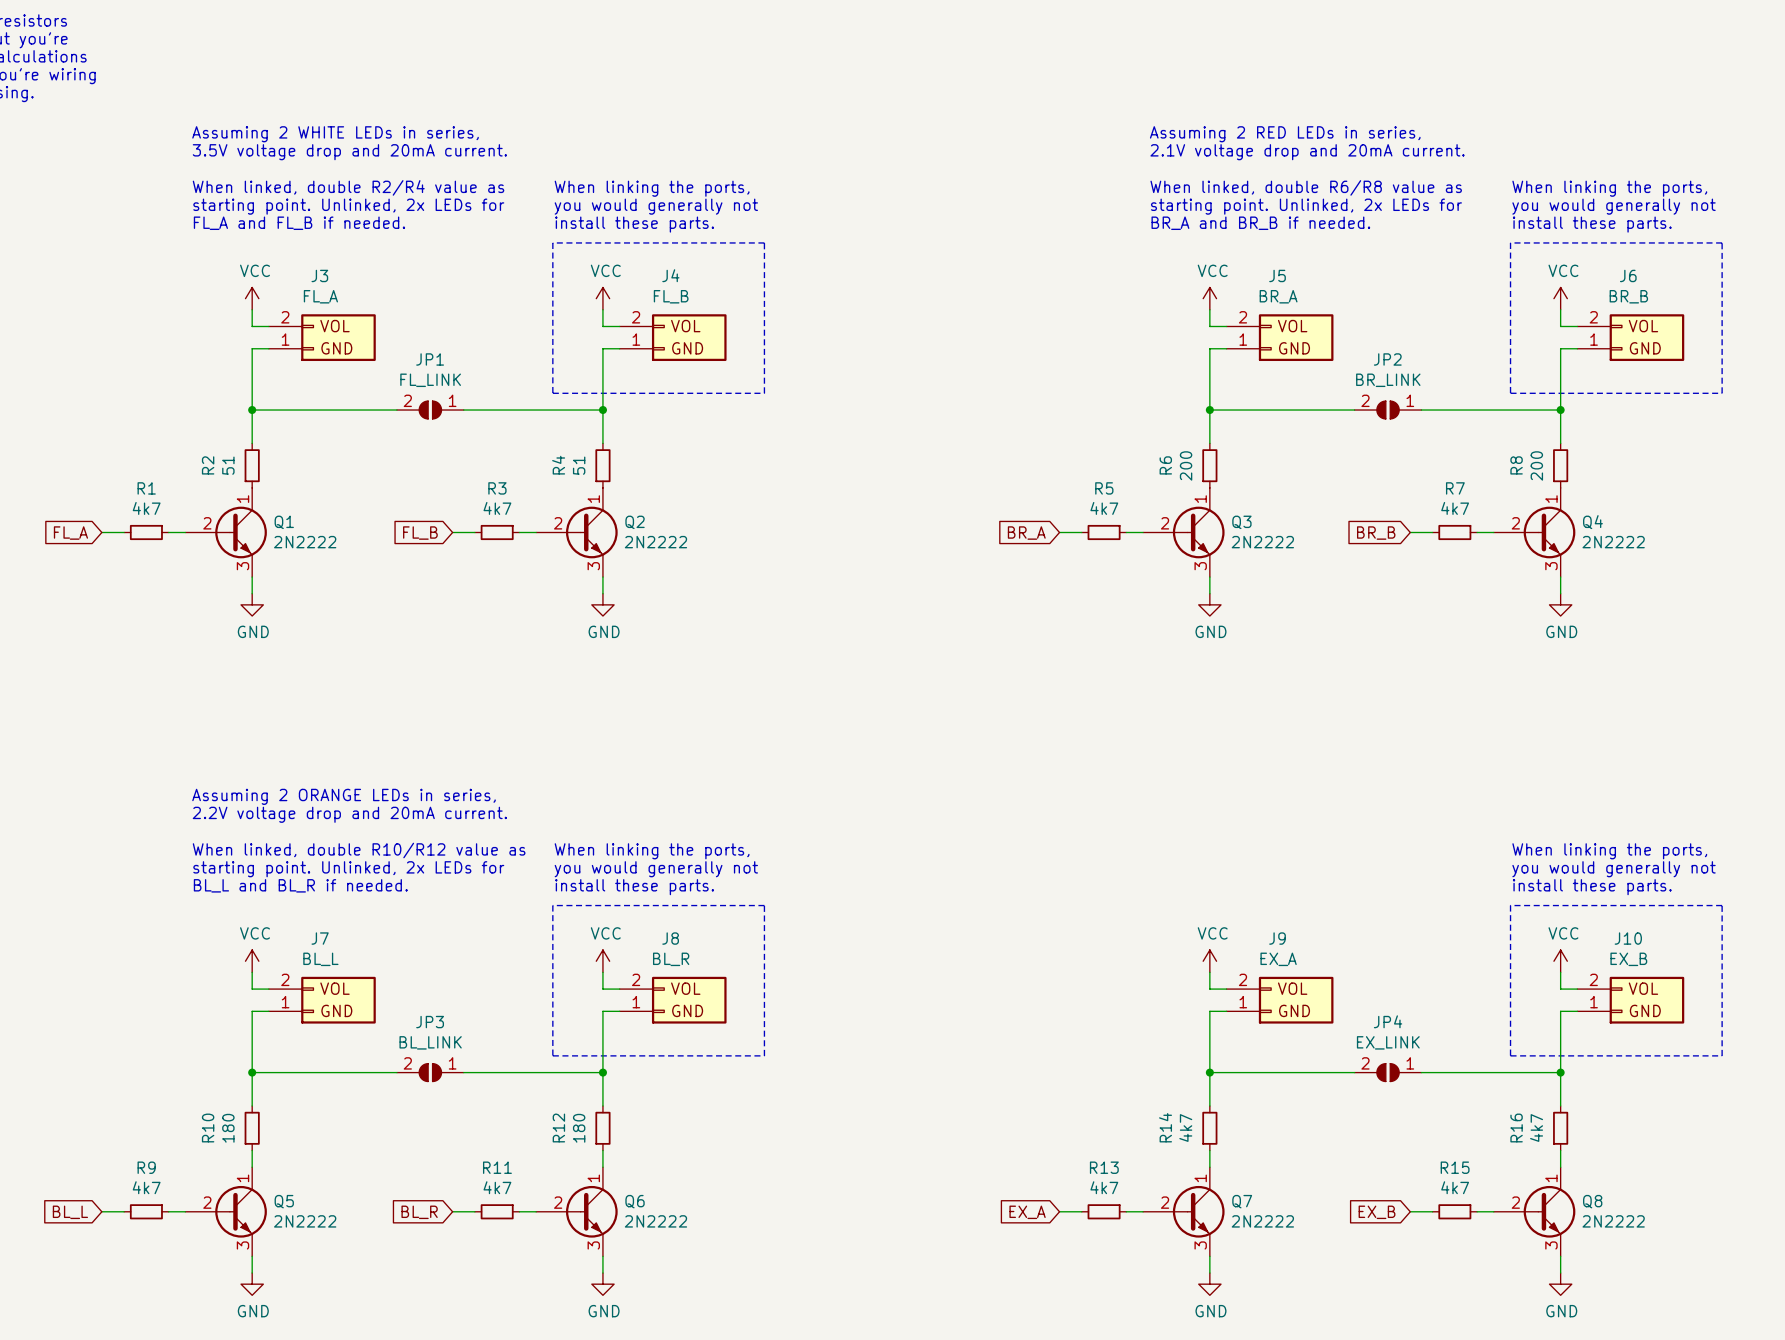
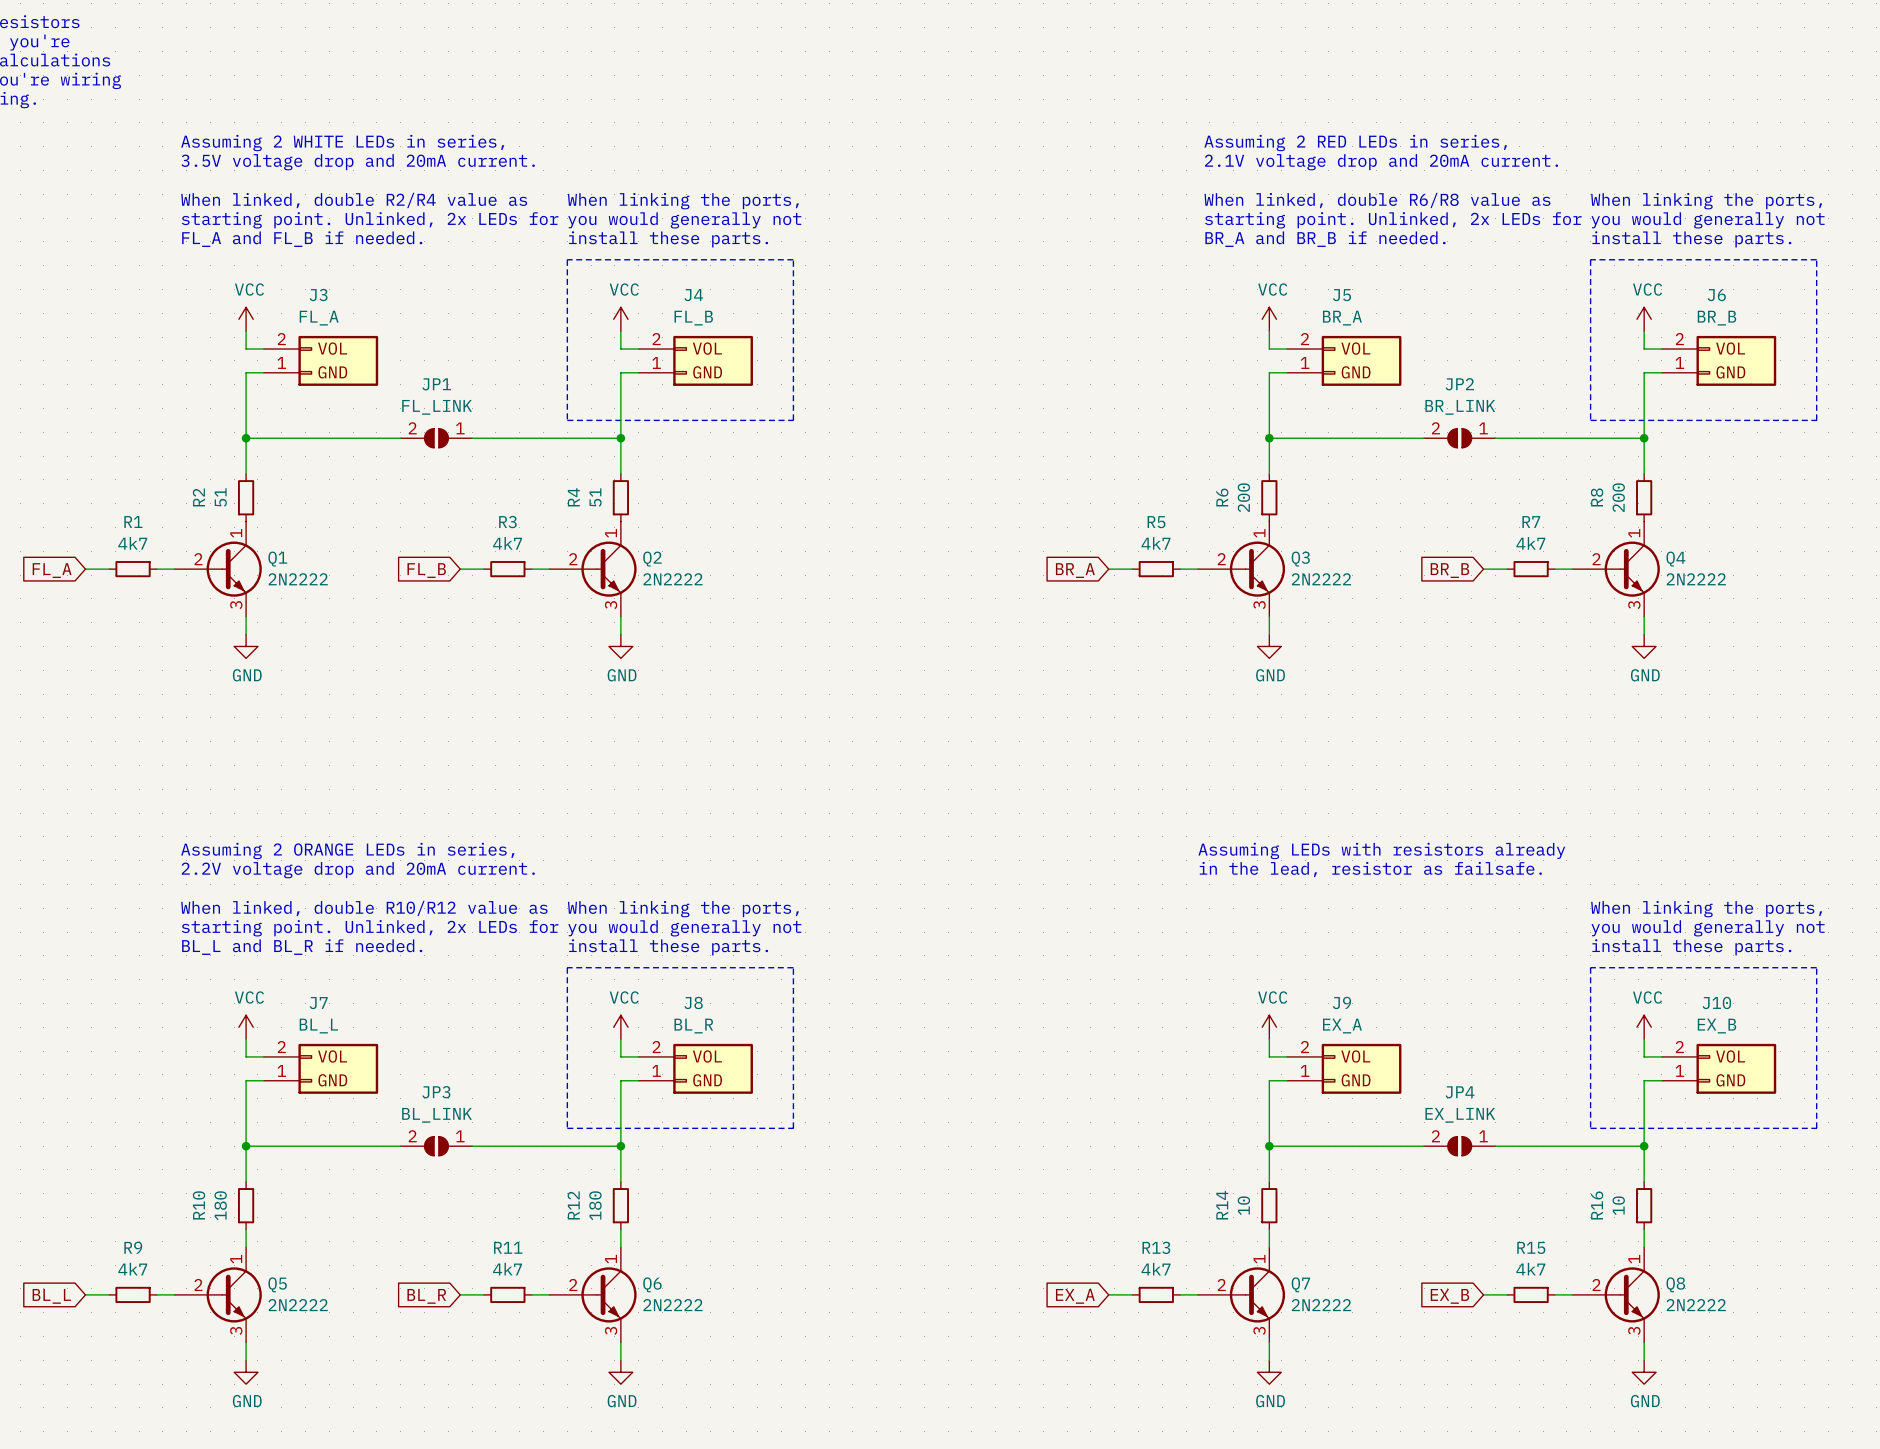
text: none -> Assuming LEDs with resistors already (1381, 850)
text: none -> in the lead, resistor as failsafe. (1370, 869)
R14 value: 4k7 (1185, 1128) -> 10 (1243, 1205)
R16 value: 4k7 (1536, 1128) -> 10 (1618, 1205)

